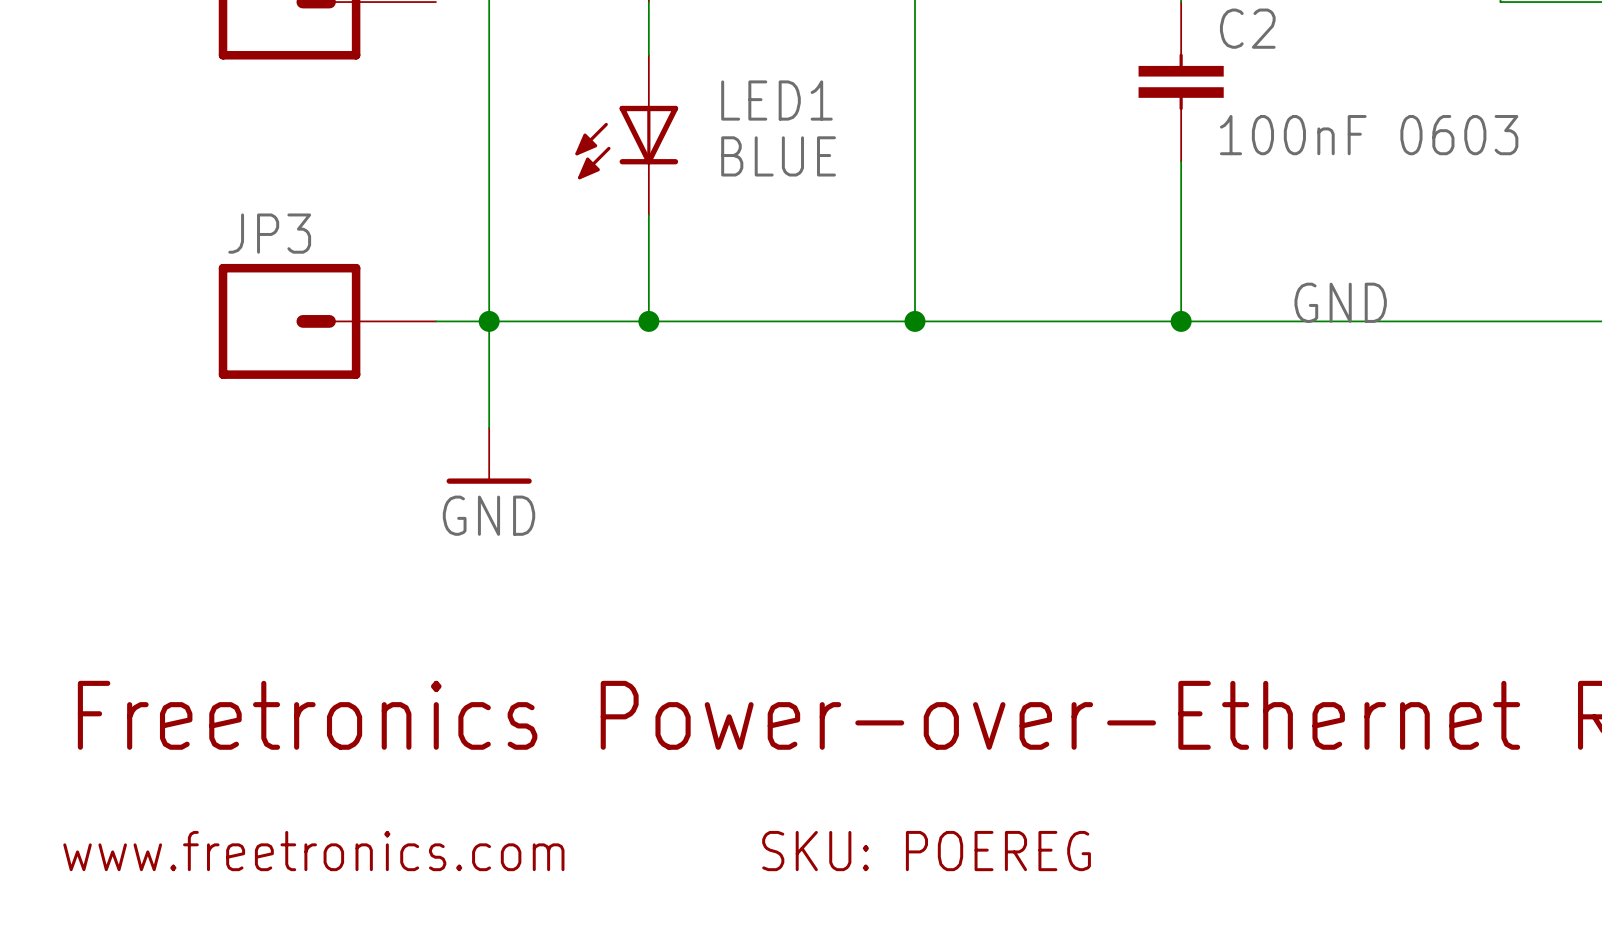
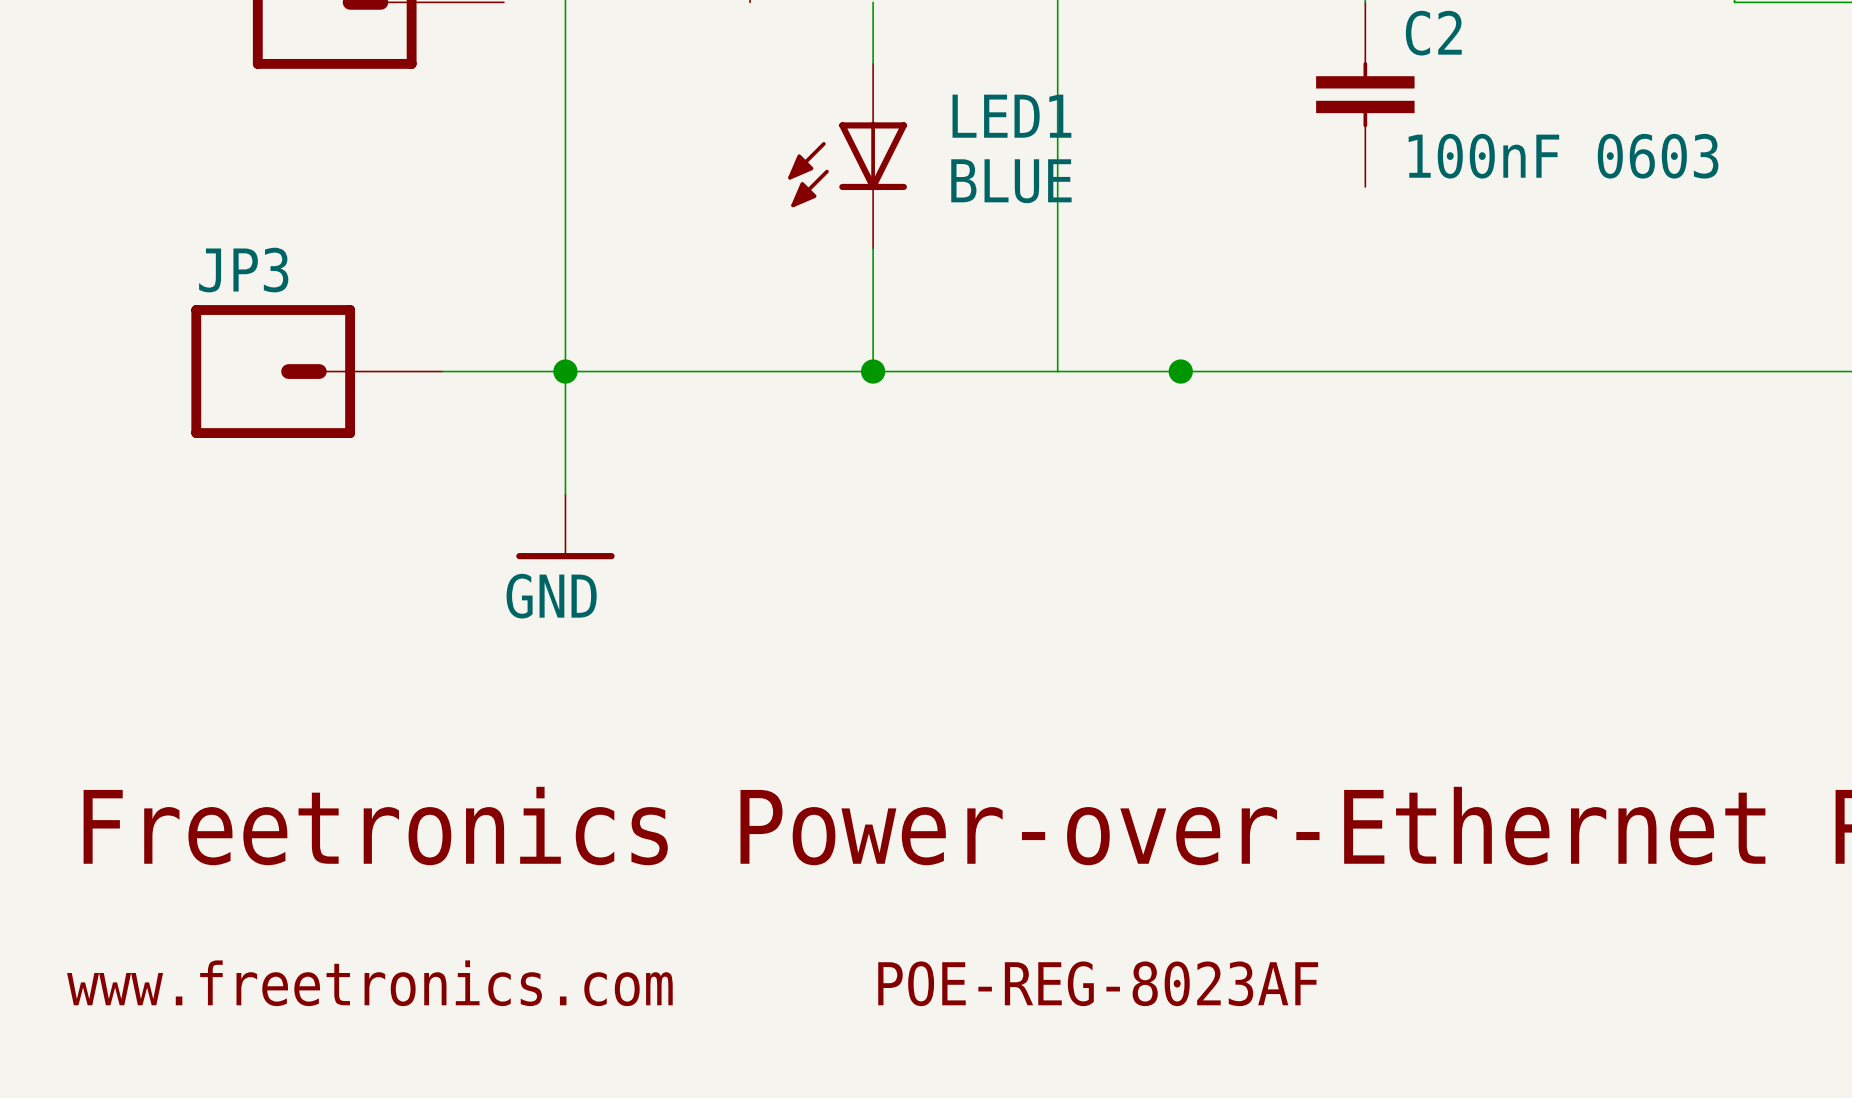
wire: (648, 2) (648, 55) -> (873, 2) (873, 63)
LED1 position: (626, 135) -> (847, 156)
wire: (1181, 161) (1181, 321) -> none
wire: (648, 214) (648, 321) -> (873, 248) (873, 371)
label: GND (1340, 302) -> none
JP3 position: (327, 321) -> (316, 371)
junction: (648, 321) -> none
junction: none -> (873, 371)
junction: (915, 321) -> none
junction: none -> (1180, 371)
junction: (1181, 321) -> none
text: SKU: POEREG (926, 851) -> POE-REG-8023AF (1098, 983)

